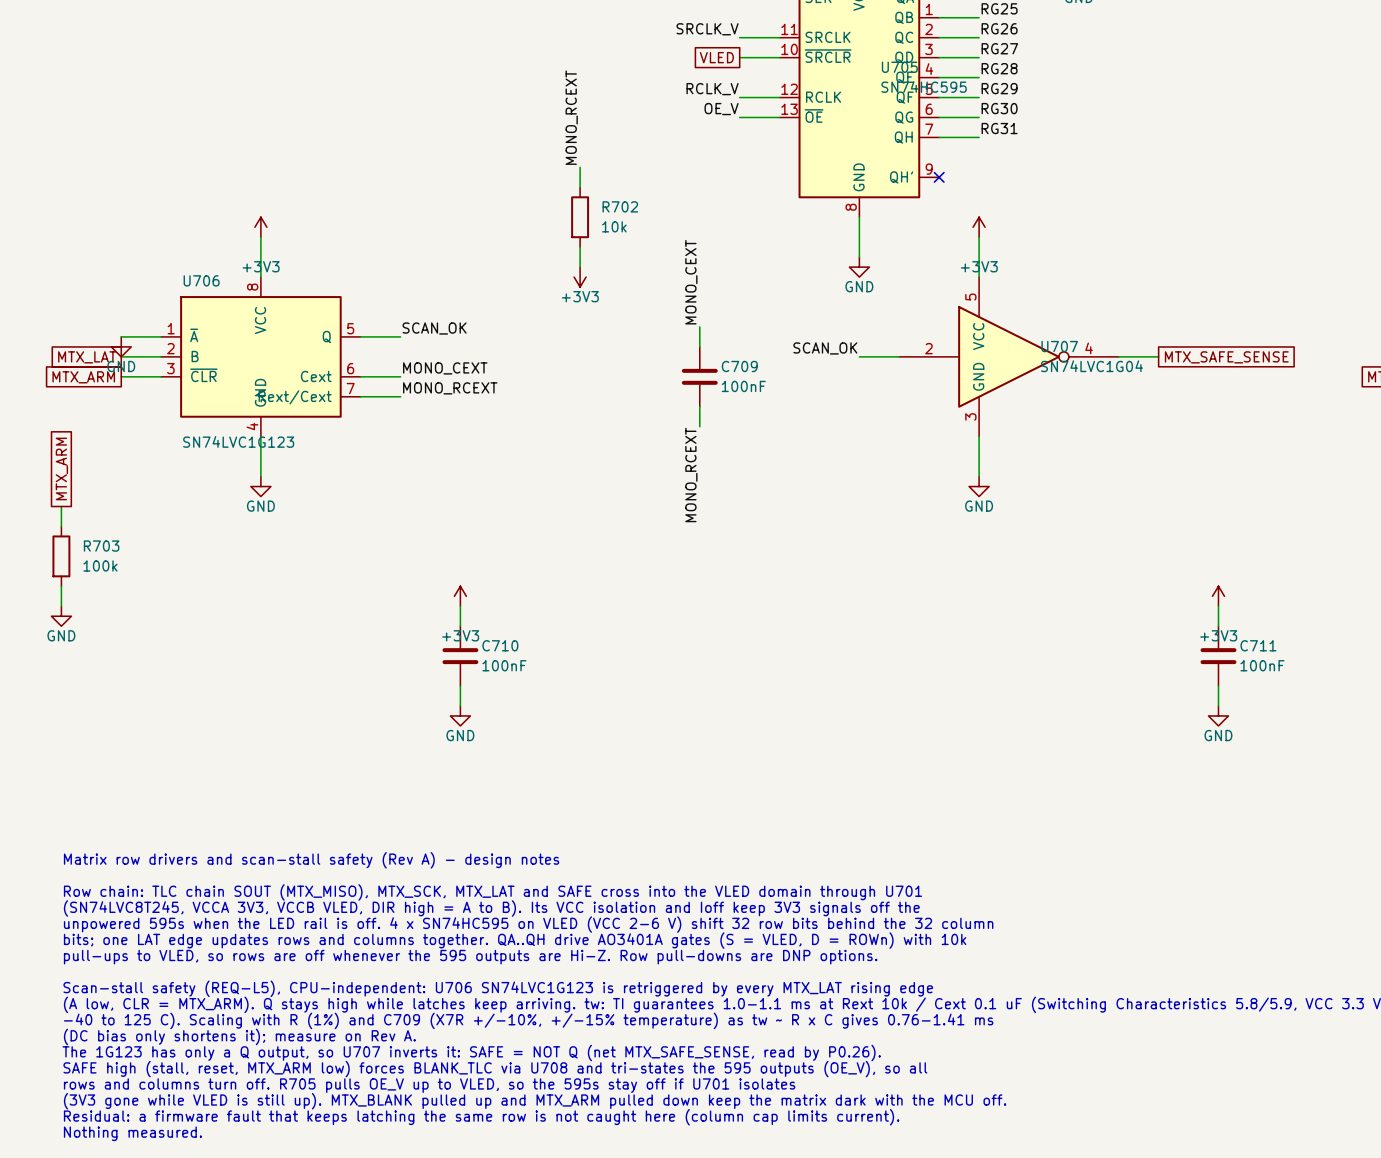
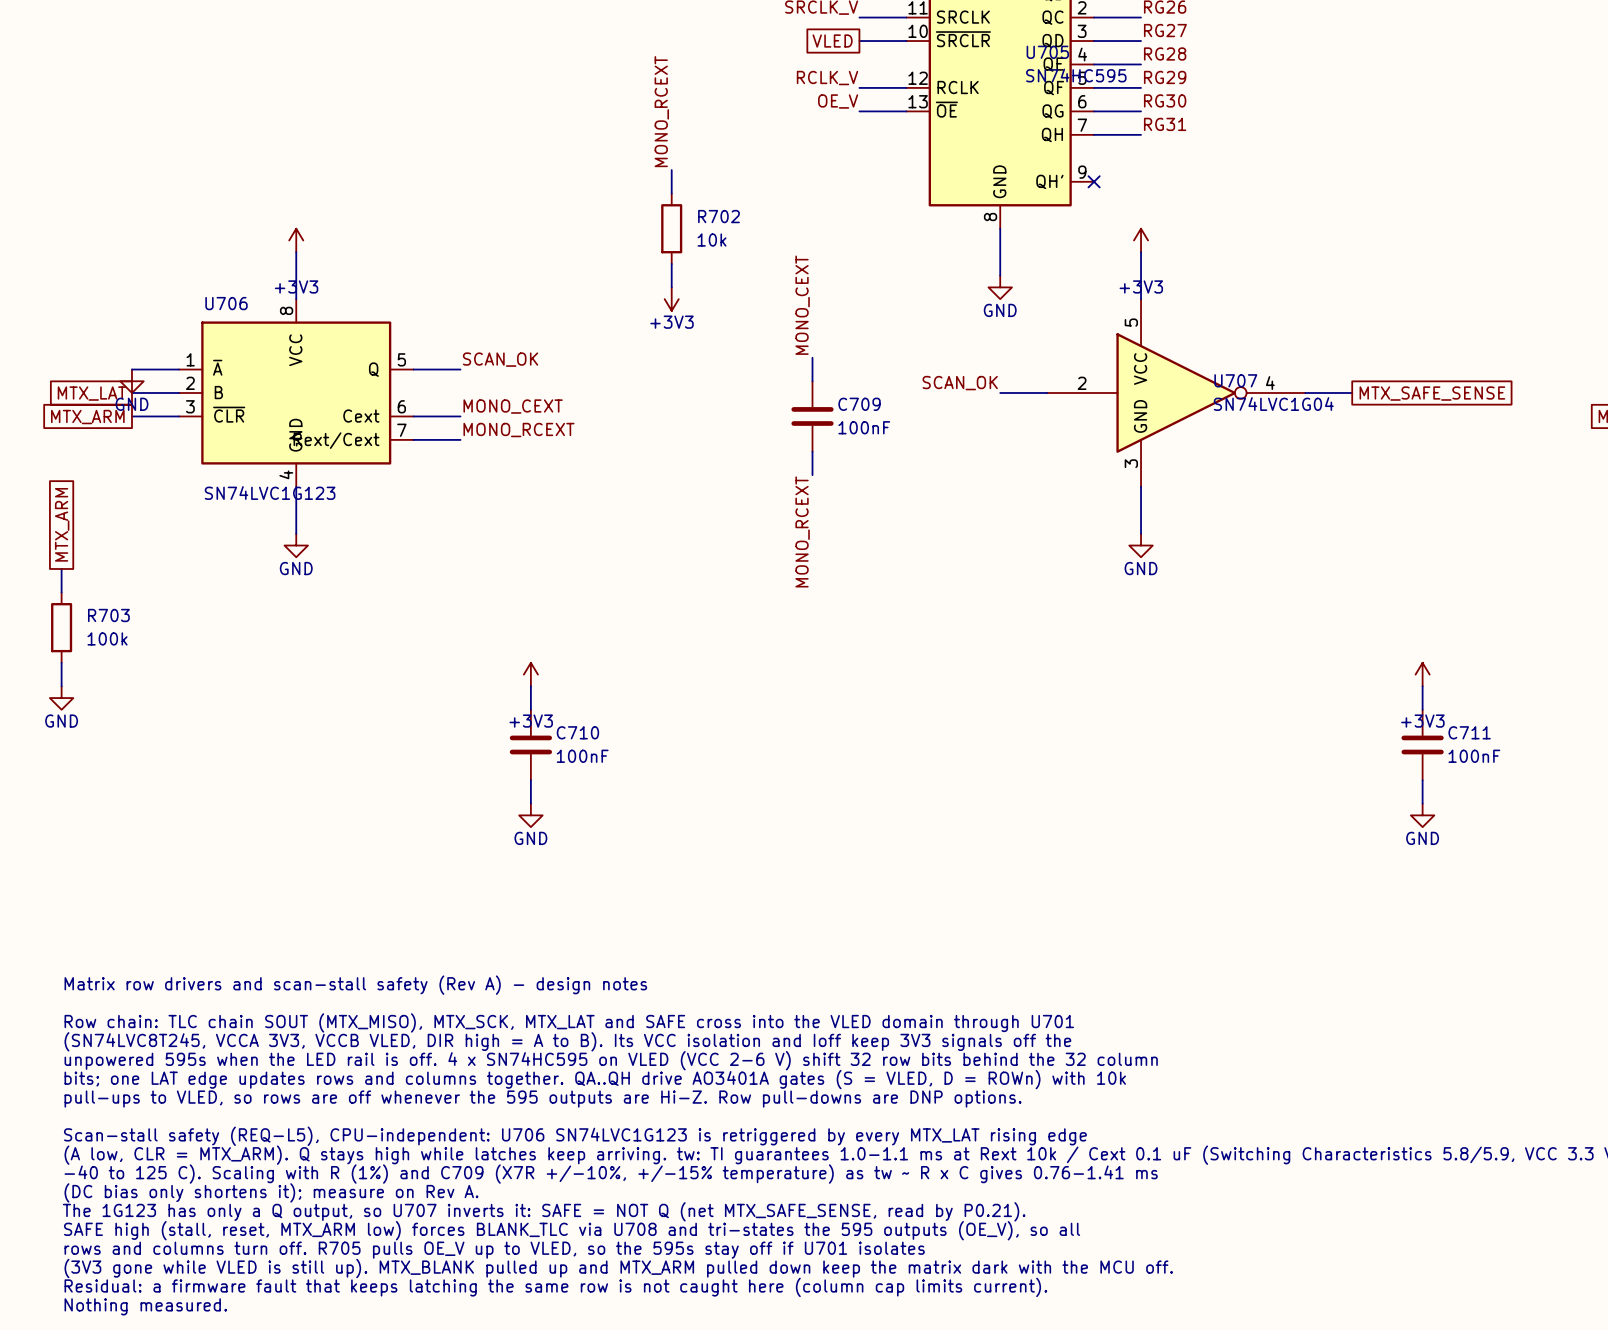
text: The 1G123 has only a Q output, so U707 inverts it: SAFE = NOT Q (net MTX_SAFE_SENSE, read by P0.26). (471, 1053) -> The 1G123 has only a Q output, so U707 inverts it: SAFE = NOT Q (net MTX_SAFE_SENSE, read by P0.21). (544, 1211)

